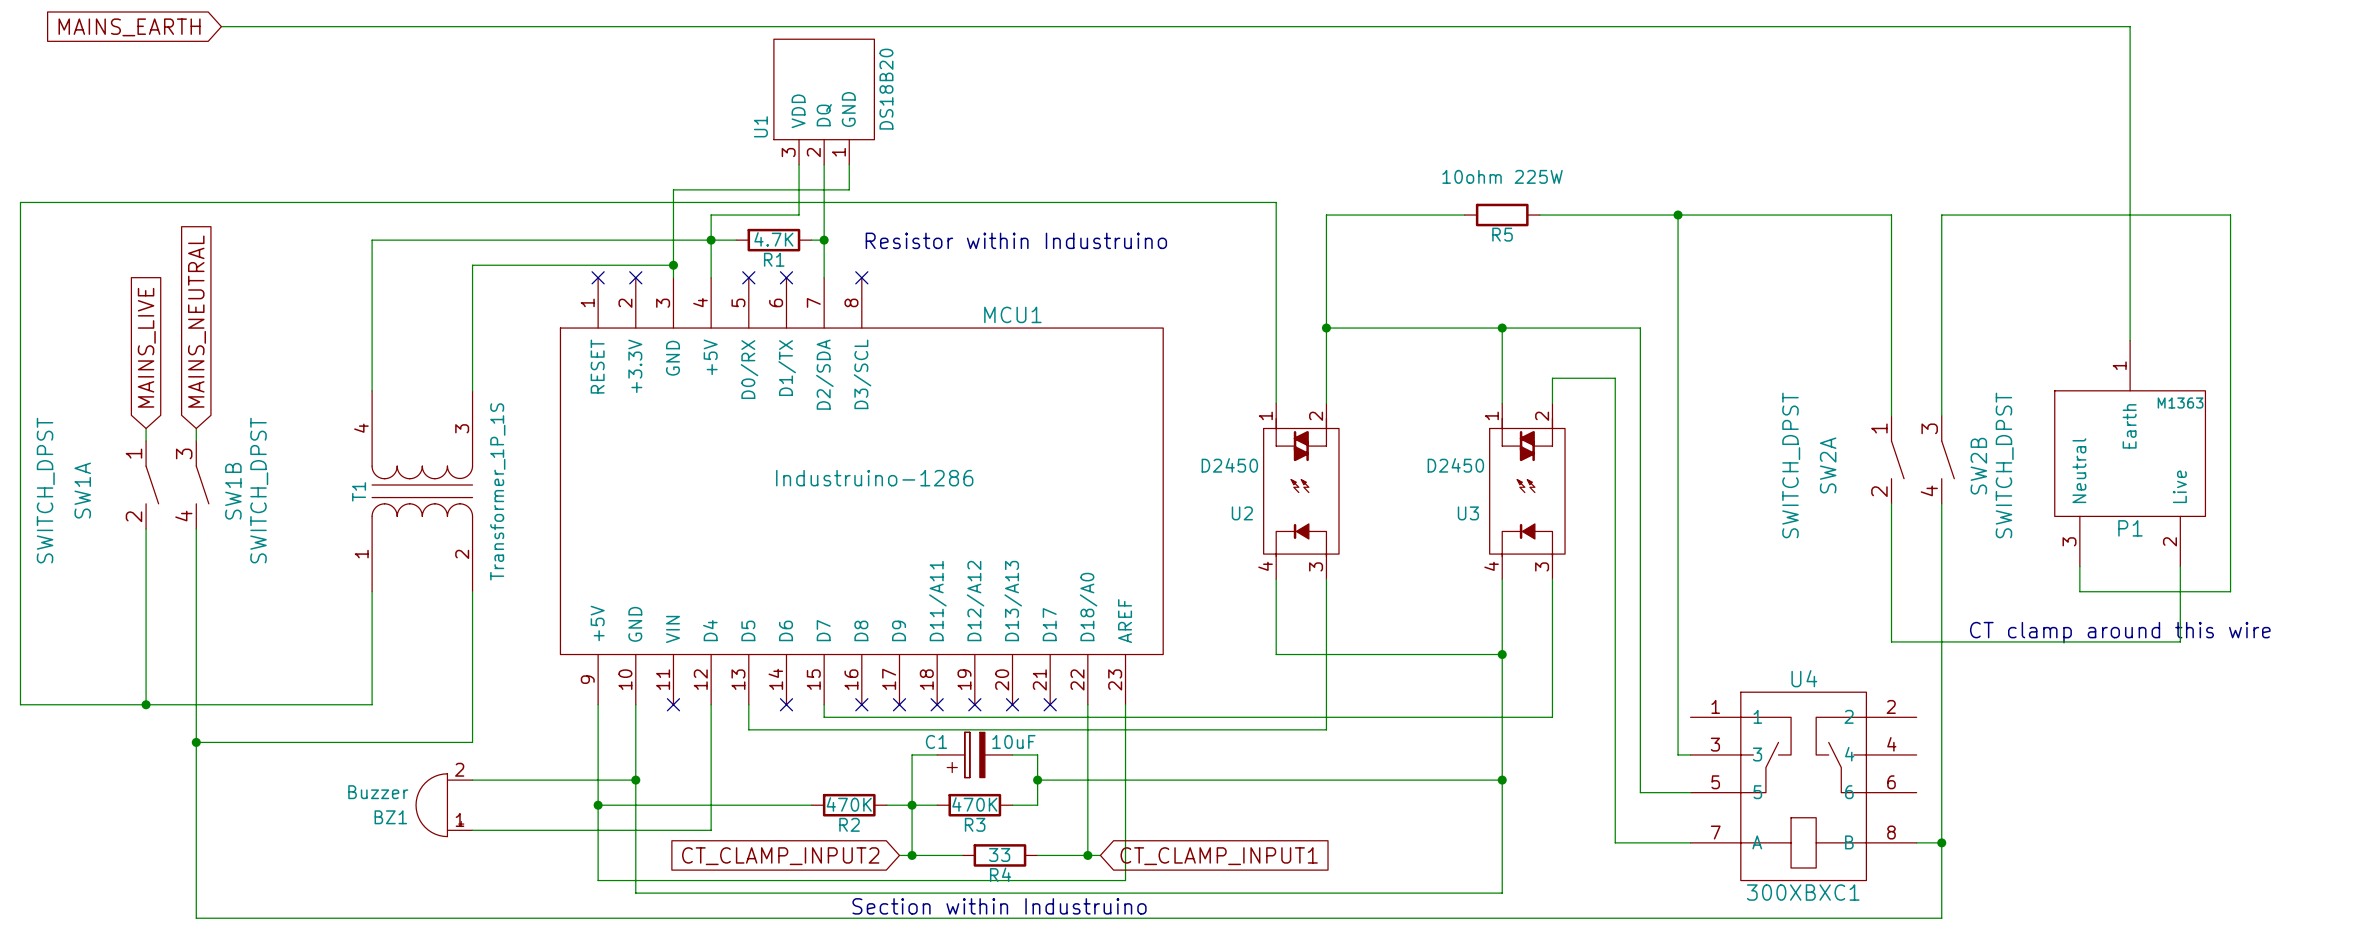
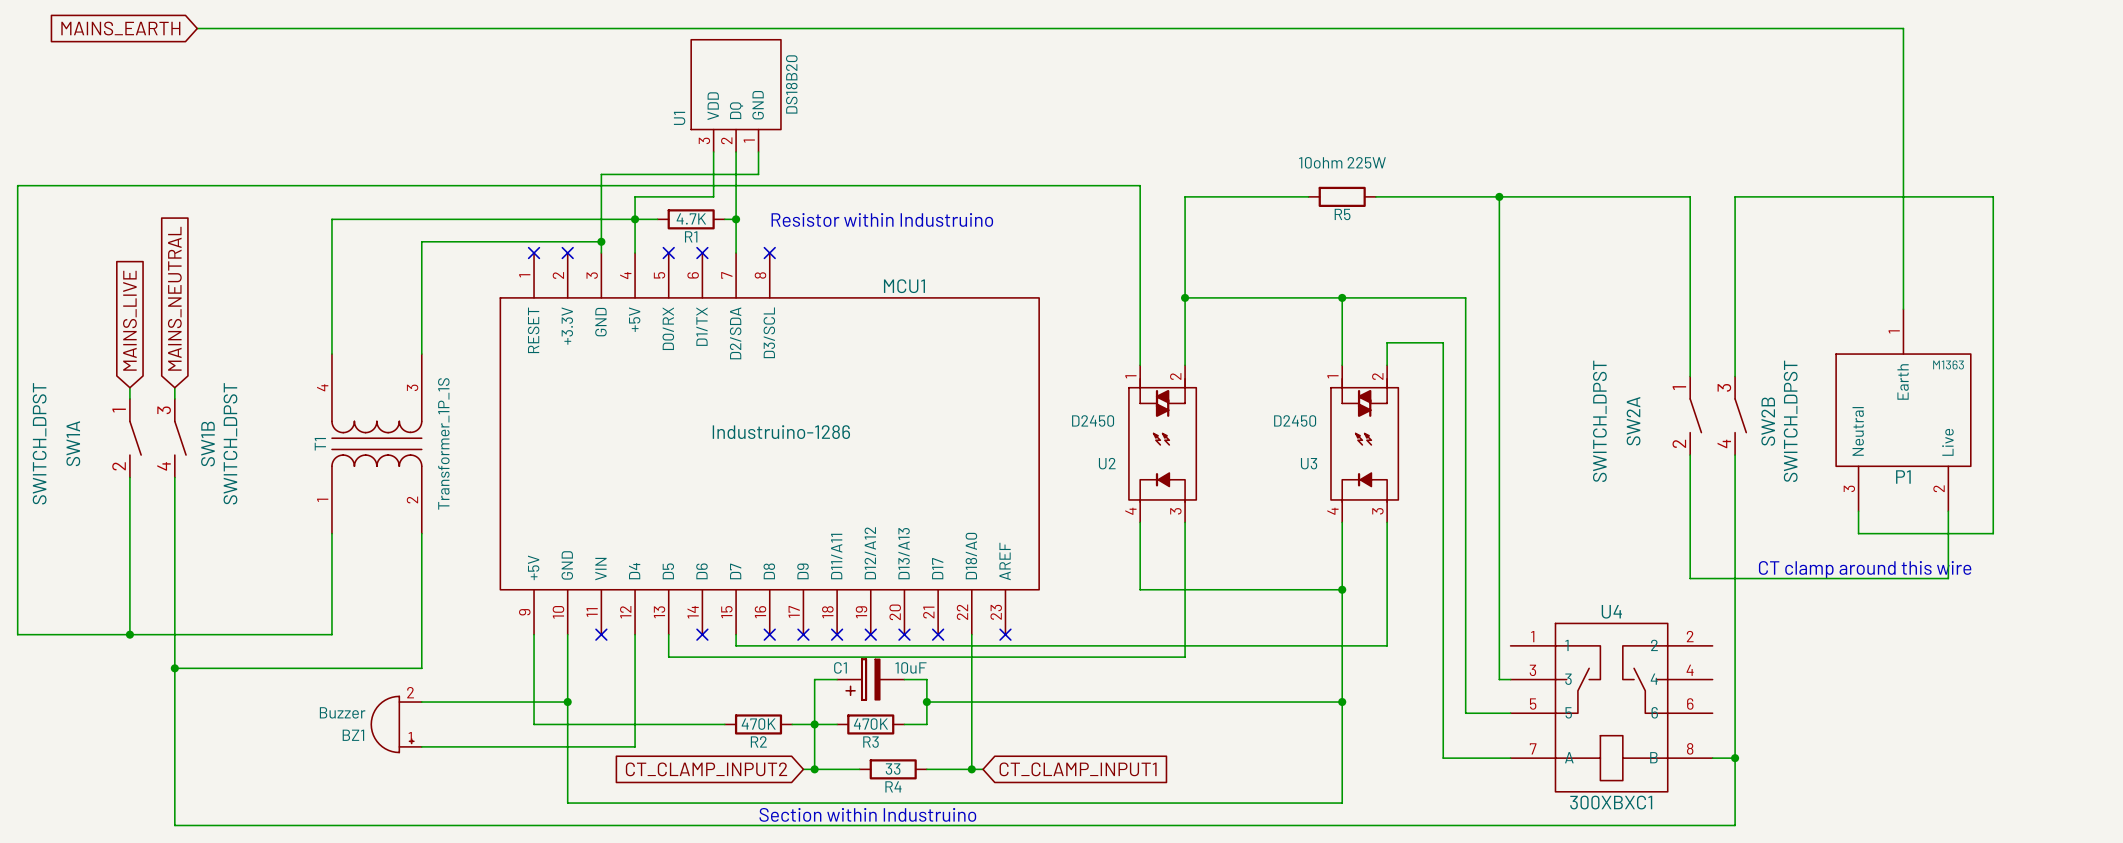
wire: (1125, 704) (1125, 880) (598, 880) (598, 805) -> none
no-connect mark: none -> (1005, 634)
junction: (598, 805) -> none

